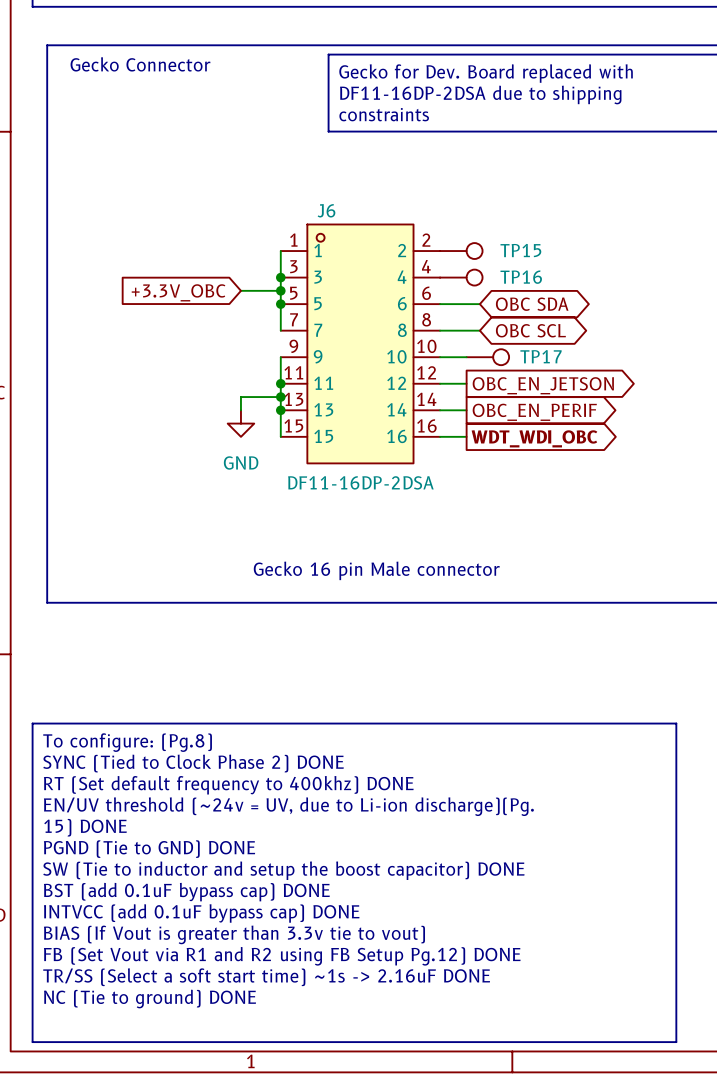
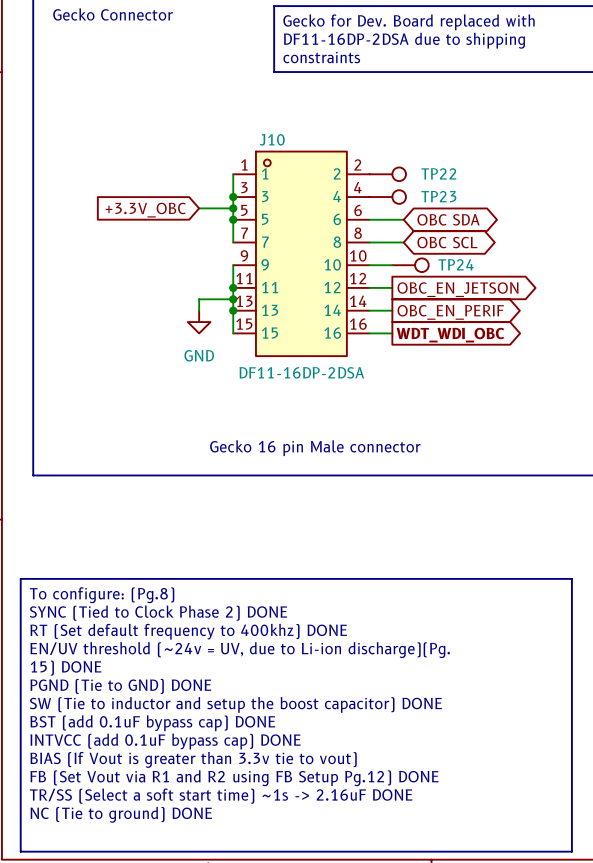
J6 name: J6 (326, 210) -> J10 (272, 139)
TP15 name: TP15 (520, 250) -> TP22 (438, 173)
TP16 name: TP16 (521, 277) -> TP23 (438, 196)
TP17 name: TP17 (541, 356) -> TP24 (456, 264)

